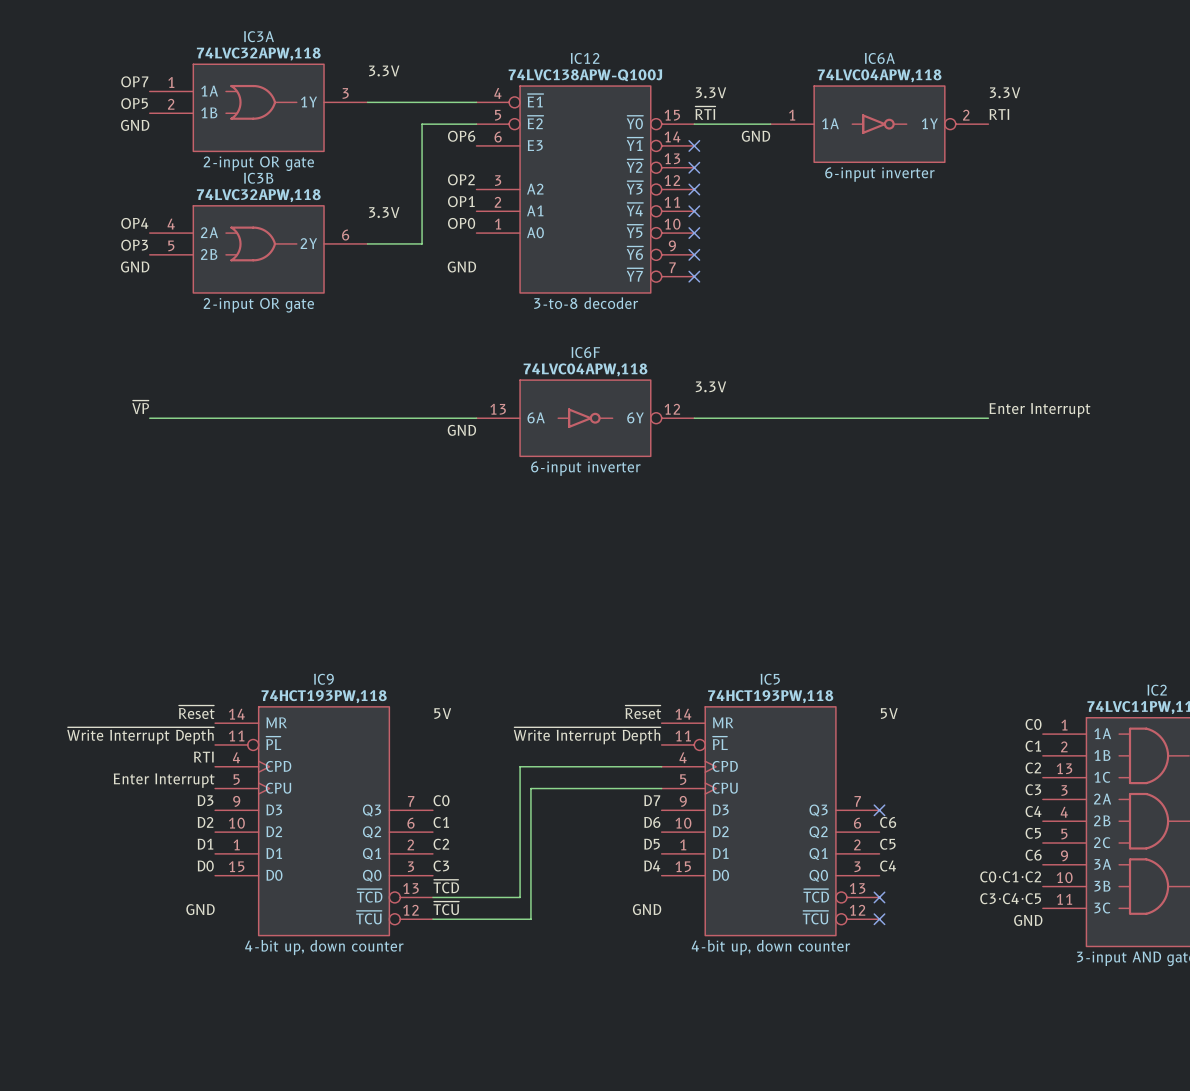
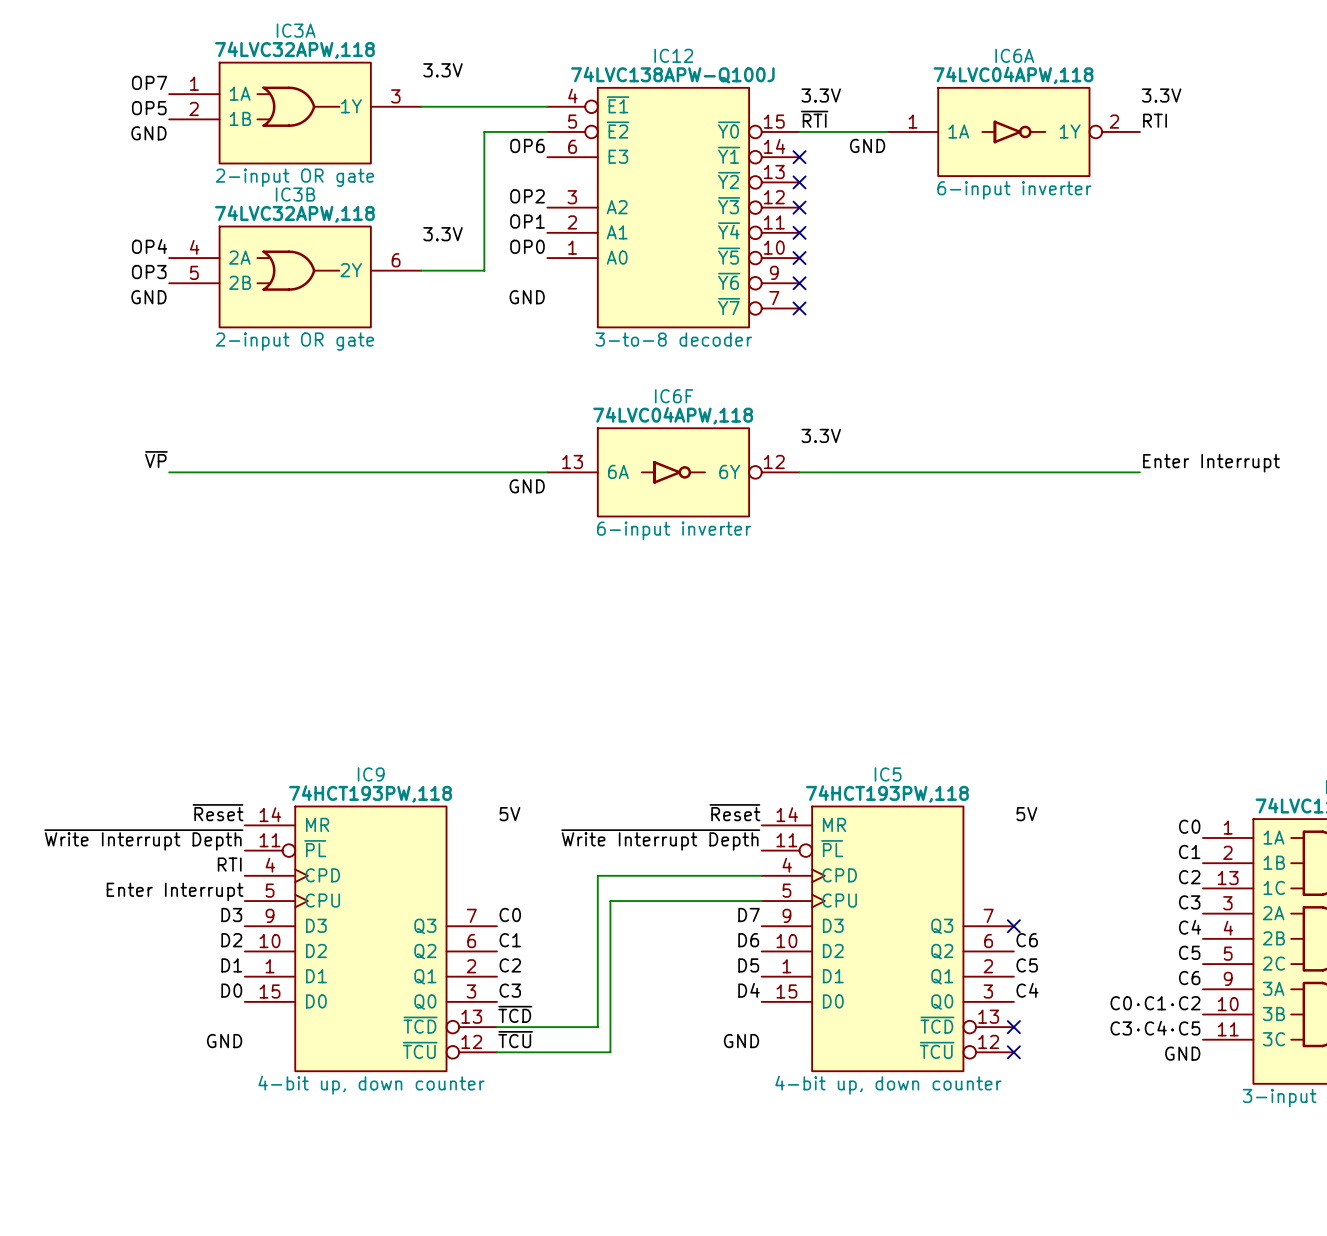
label: C0⋅C1⋅C2 (1010, 876) -> C0·C1·C2 (1155, 1003)
label: C3⋅C4⋅C5 (1010, 898) -> C3·C4·C5 (1155, 1028)

